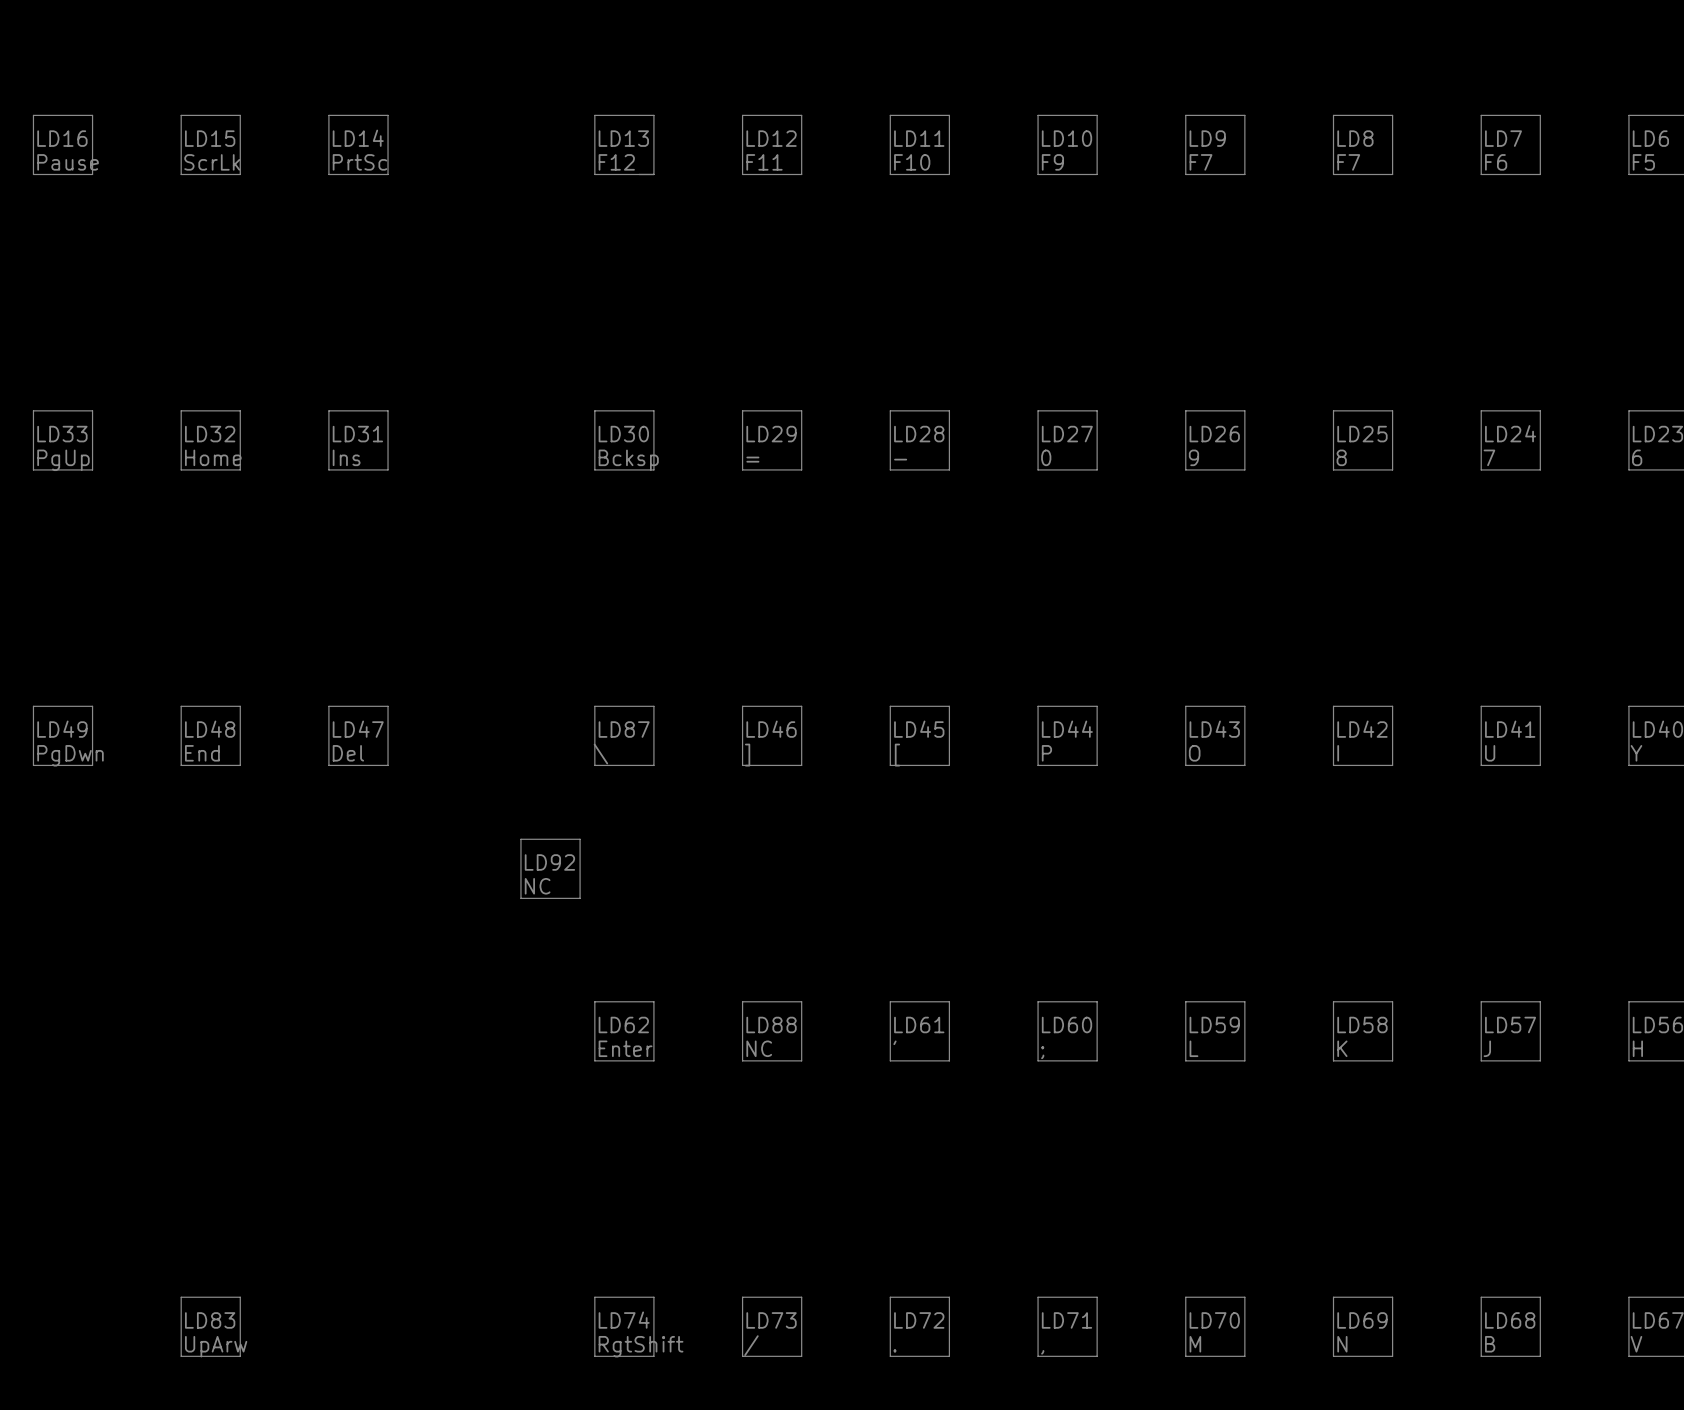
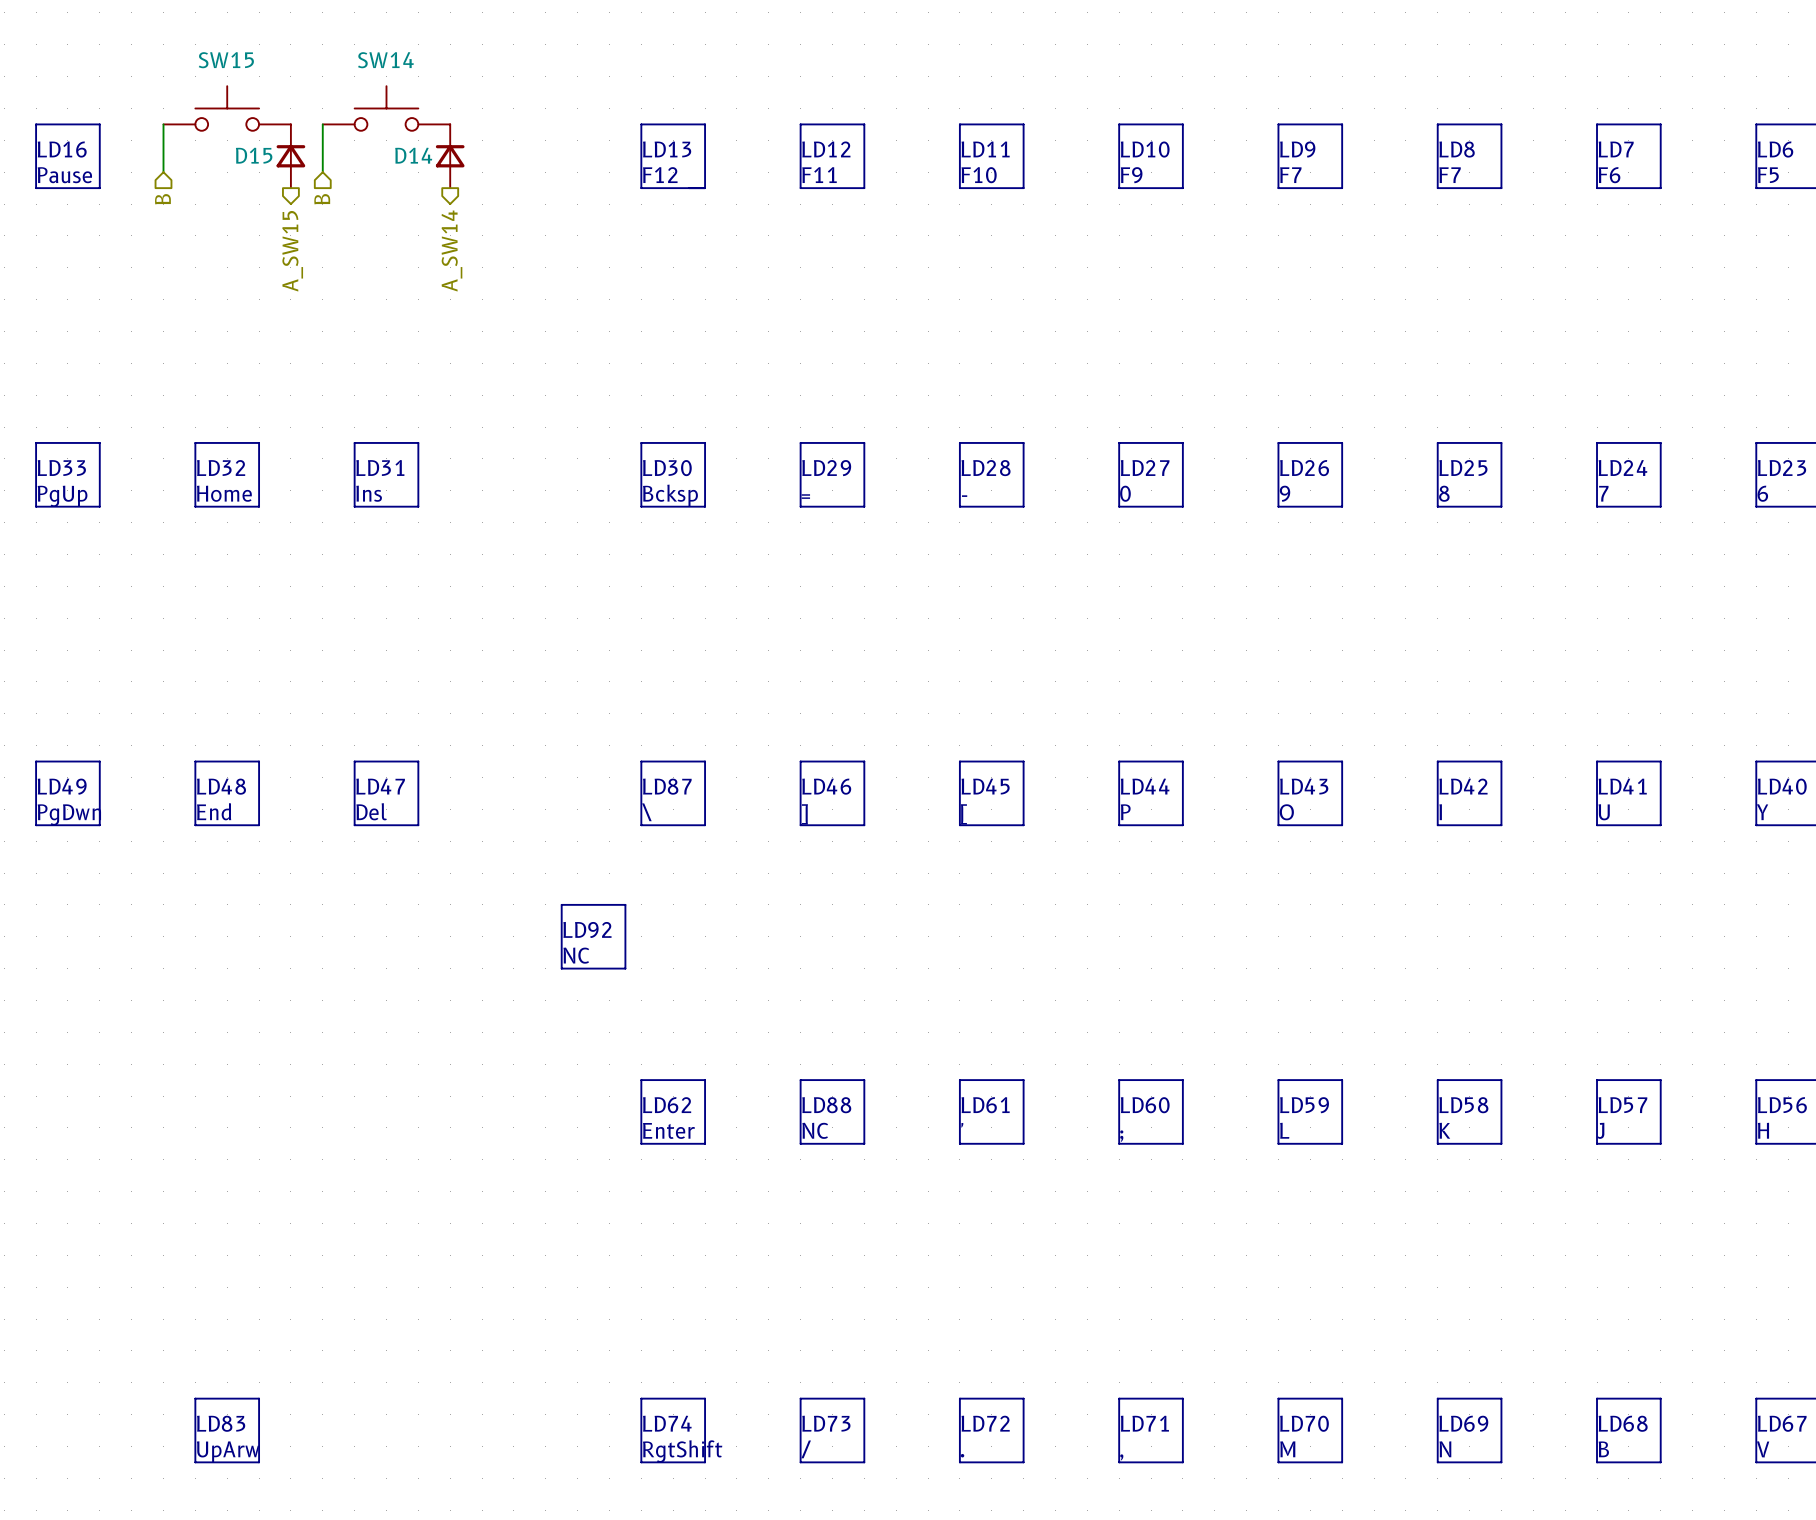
SW15: none -> (227, 108)
SW14: none -> (386, 108)
wire: none -> (163, 124) (163, 172)
line: (181, 115) (181, 174) (240, 174) (240, 115) (181, 115) -> none
wire: none -> (322, 124) (322, 172)
line: (328, 115) (388, 115) (388, 174) (328, 174) (328, 115) -> none
text: LD15 (210, 138) -> none
text: LD14 (358, 138) -> none
D15: none -> (290, 156)
D14: none -> (450, 156)
text: ScrLk (212, 162) -> none
text: PrtSc (359, 162) -> none
hierarchical label: none -> B (162, 199)
hierarchical label: none -> B (322, 199)
hierarchical label: none -> A_SW15 (292, 251)
hierarchical label: none -> A_SW14 (451, 250)

